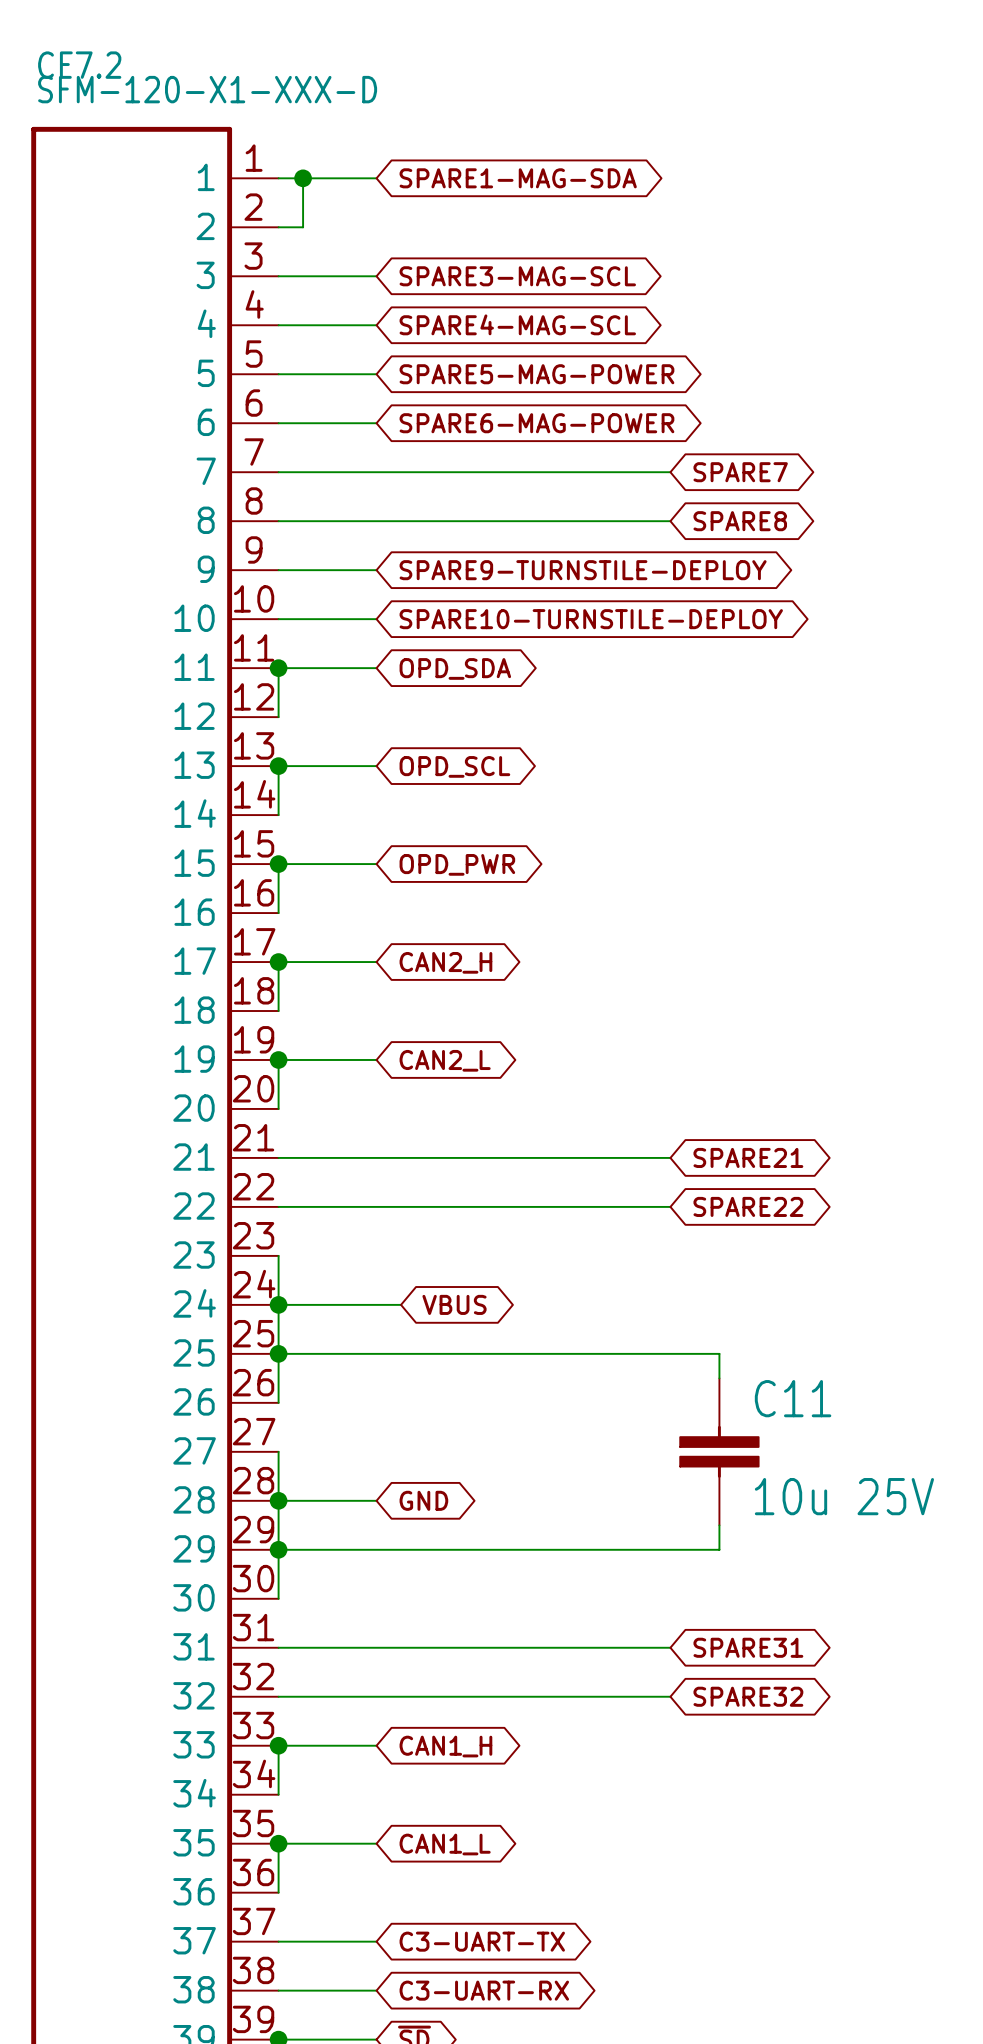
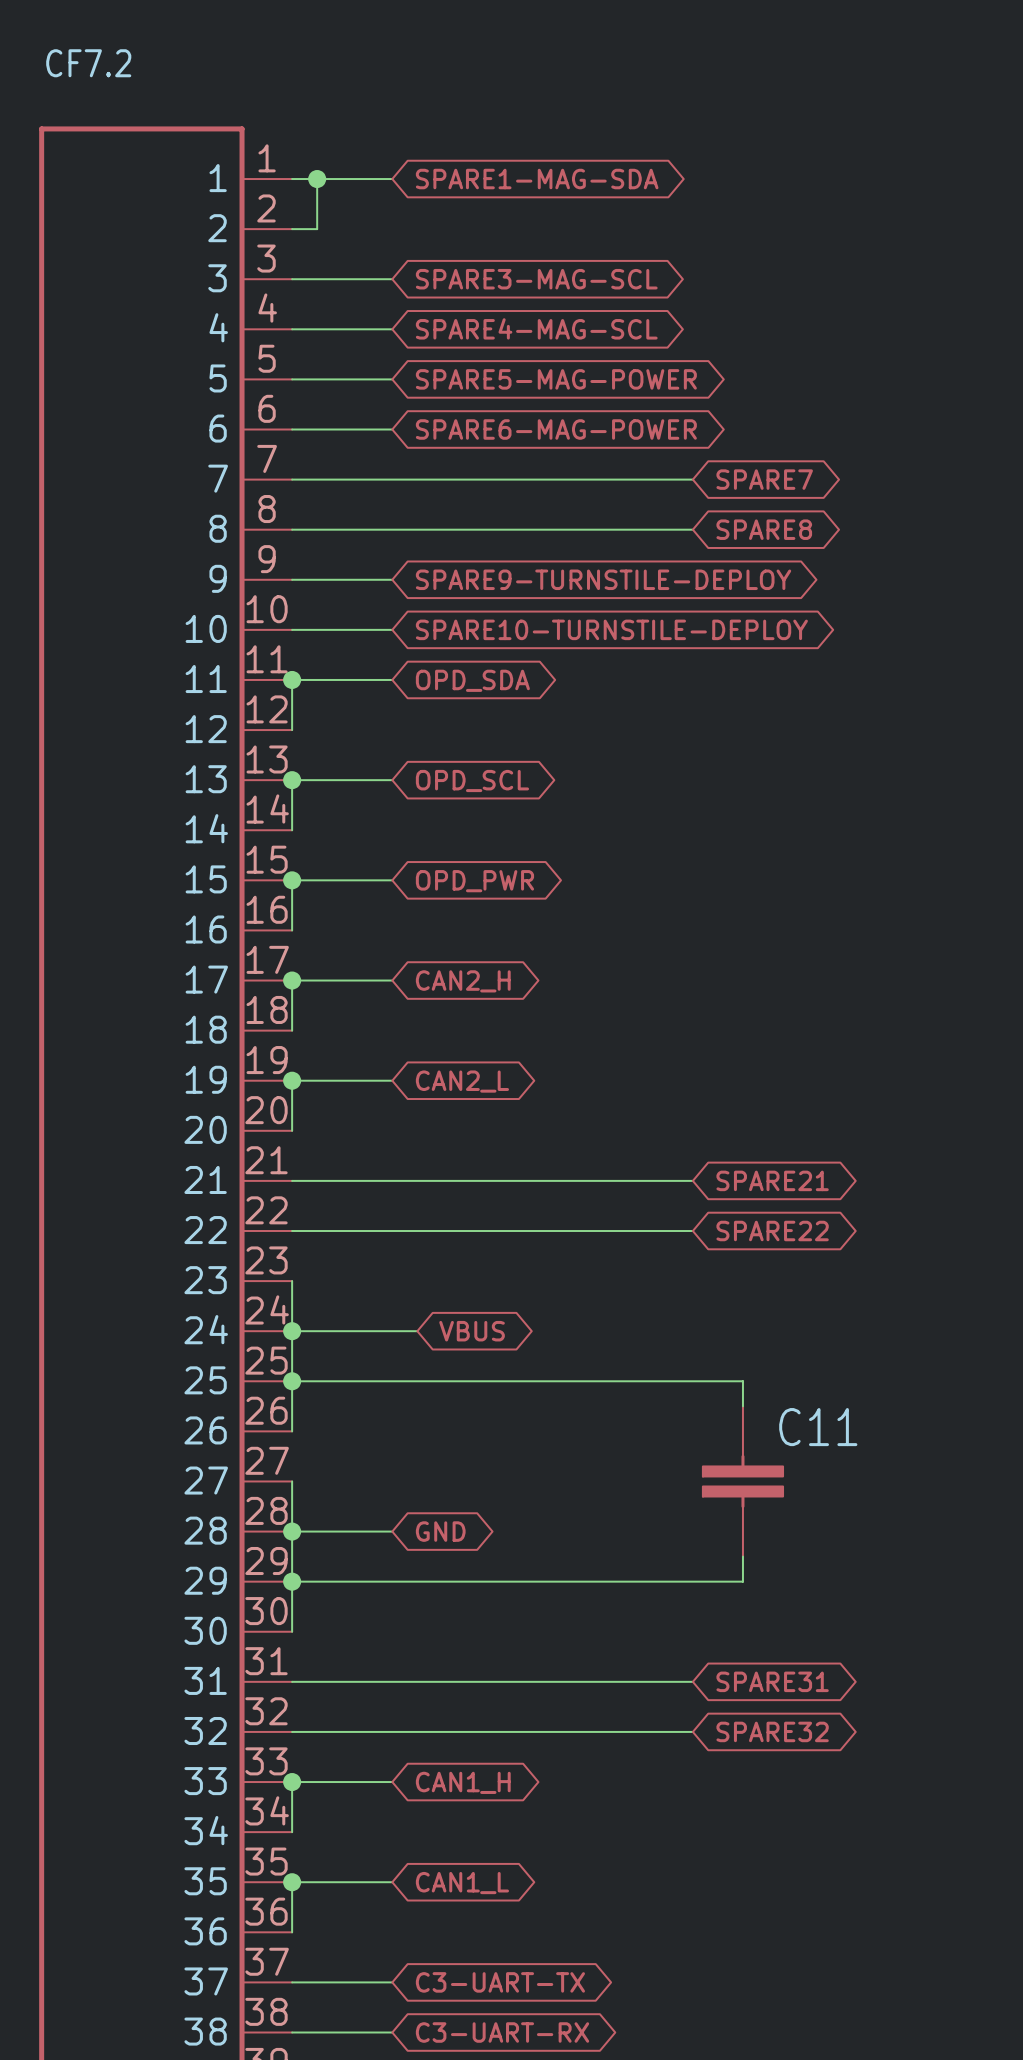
CF7.2 value: SFM-120-X1-XXX-D (207, 89) -> none
C11 value: 10u 25V (844, 1496) -> none

